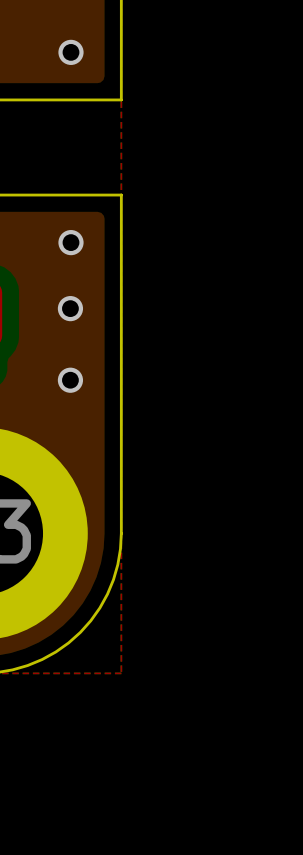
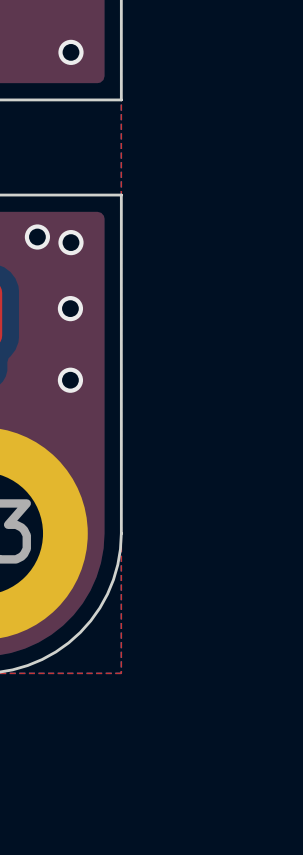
via: none -> (37, 237)

